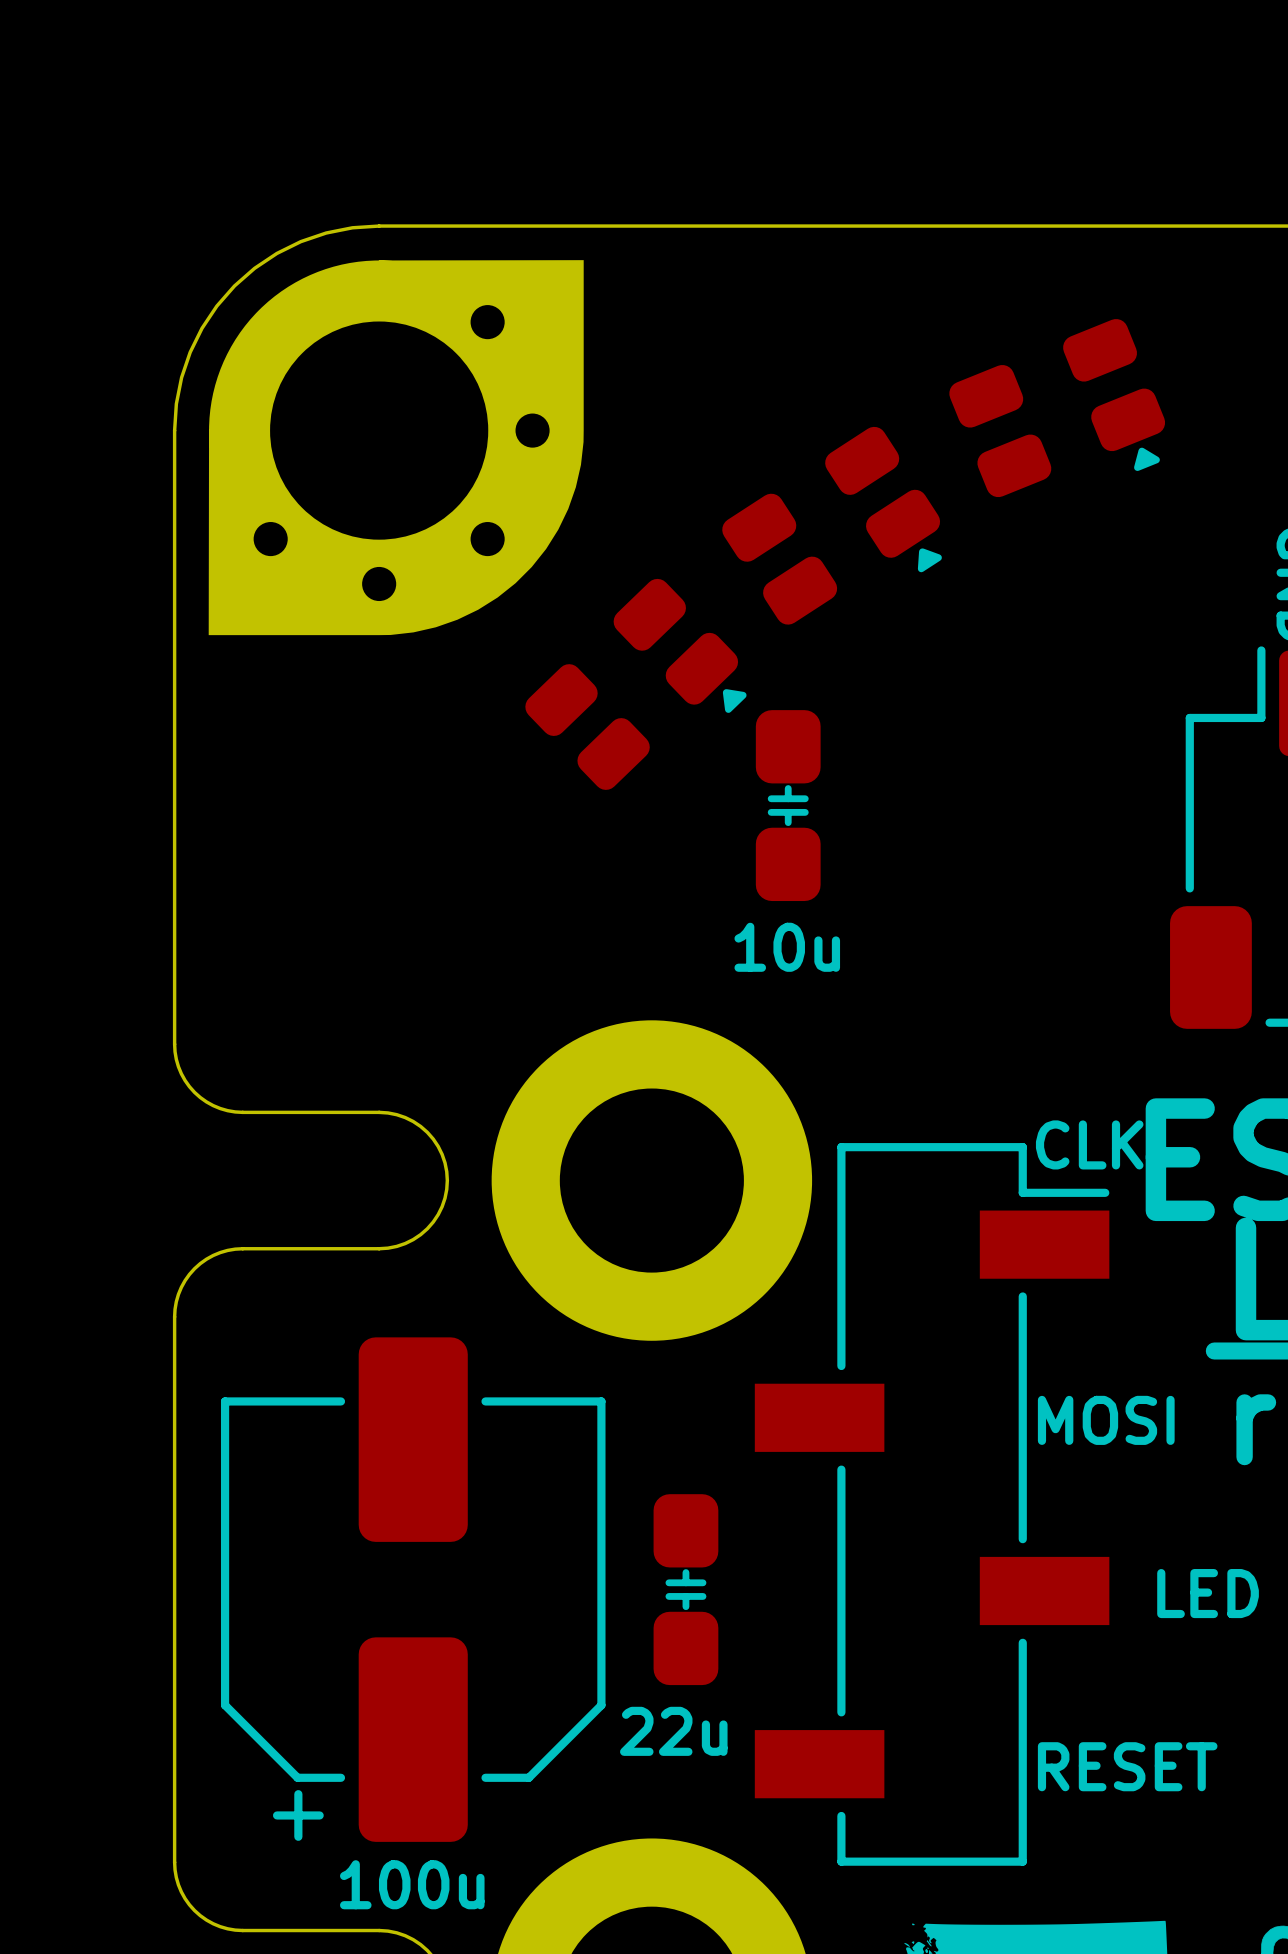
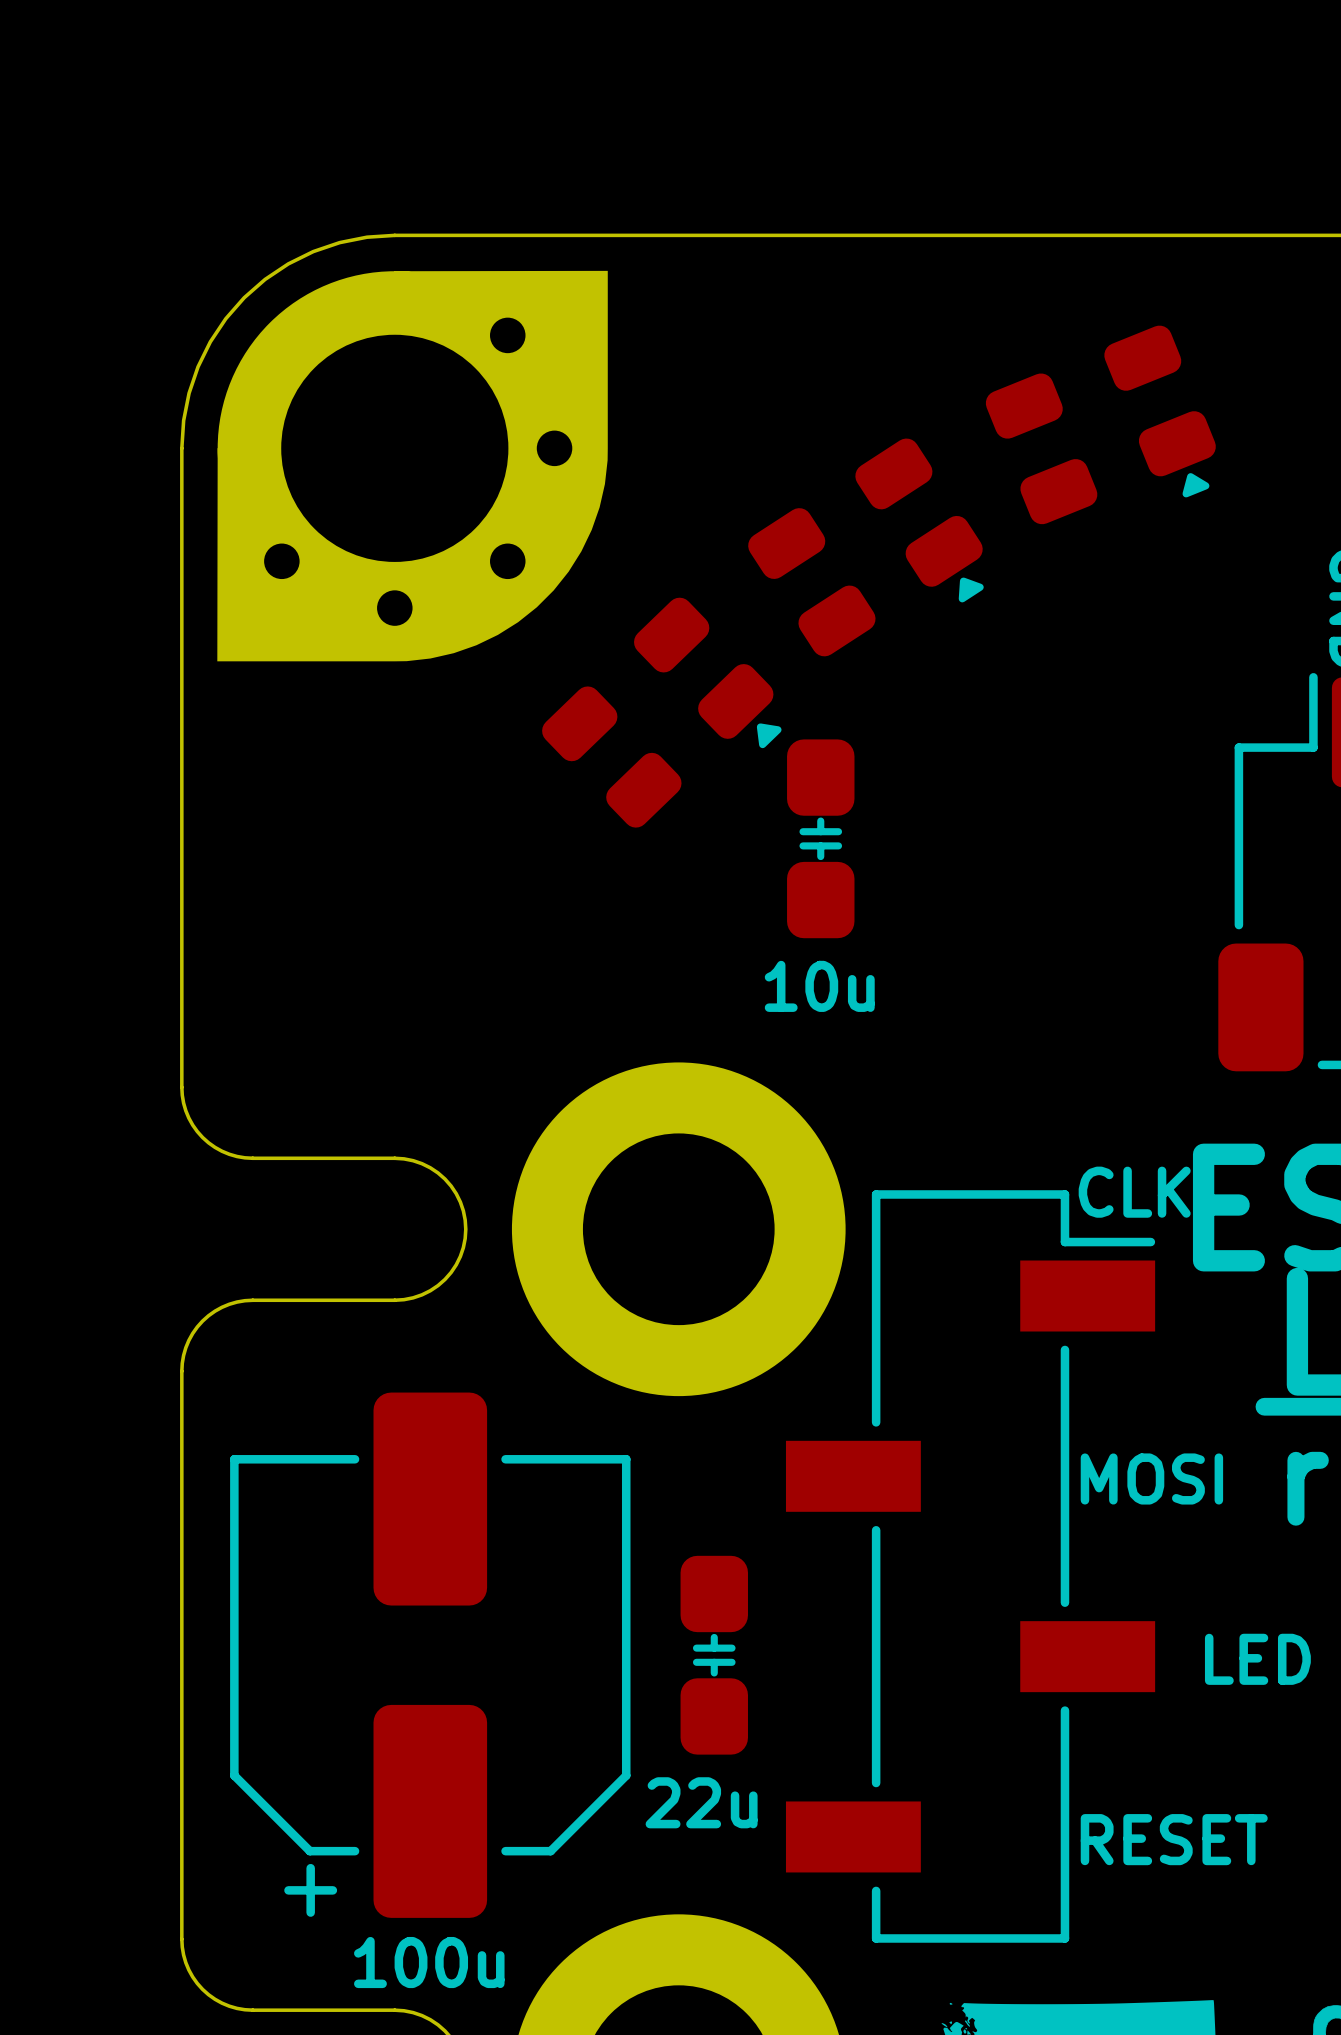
part footprint: [949, 319, 1166, 498] -> [985, 325, 1216, 525]
part footprint: [722, 426, 942, 625] -> [748, 438, 984, 657]
part footprint: [525, 578, 747, 790] -> [542, 597, 782, 828]

